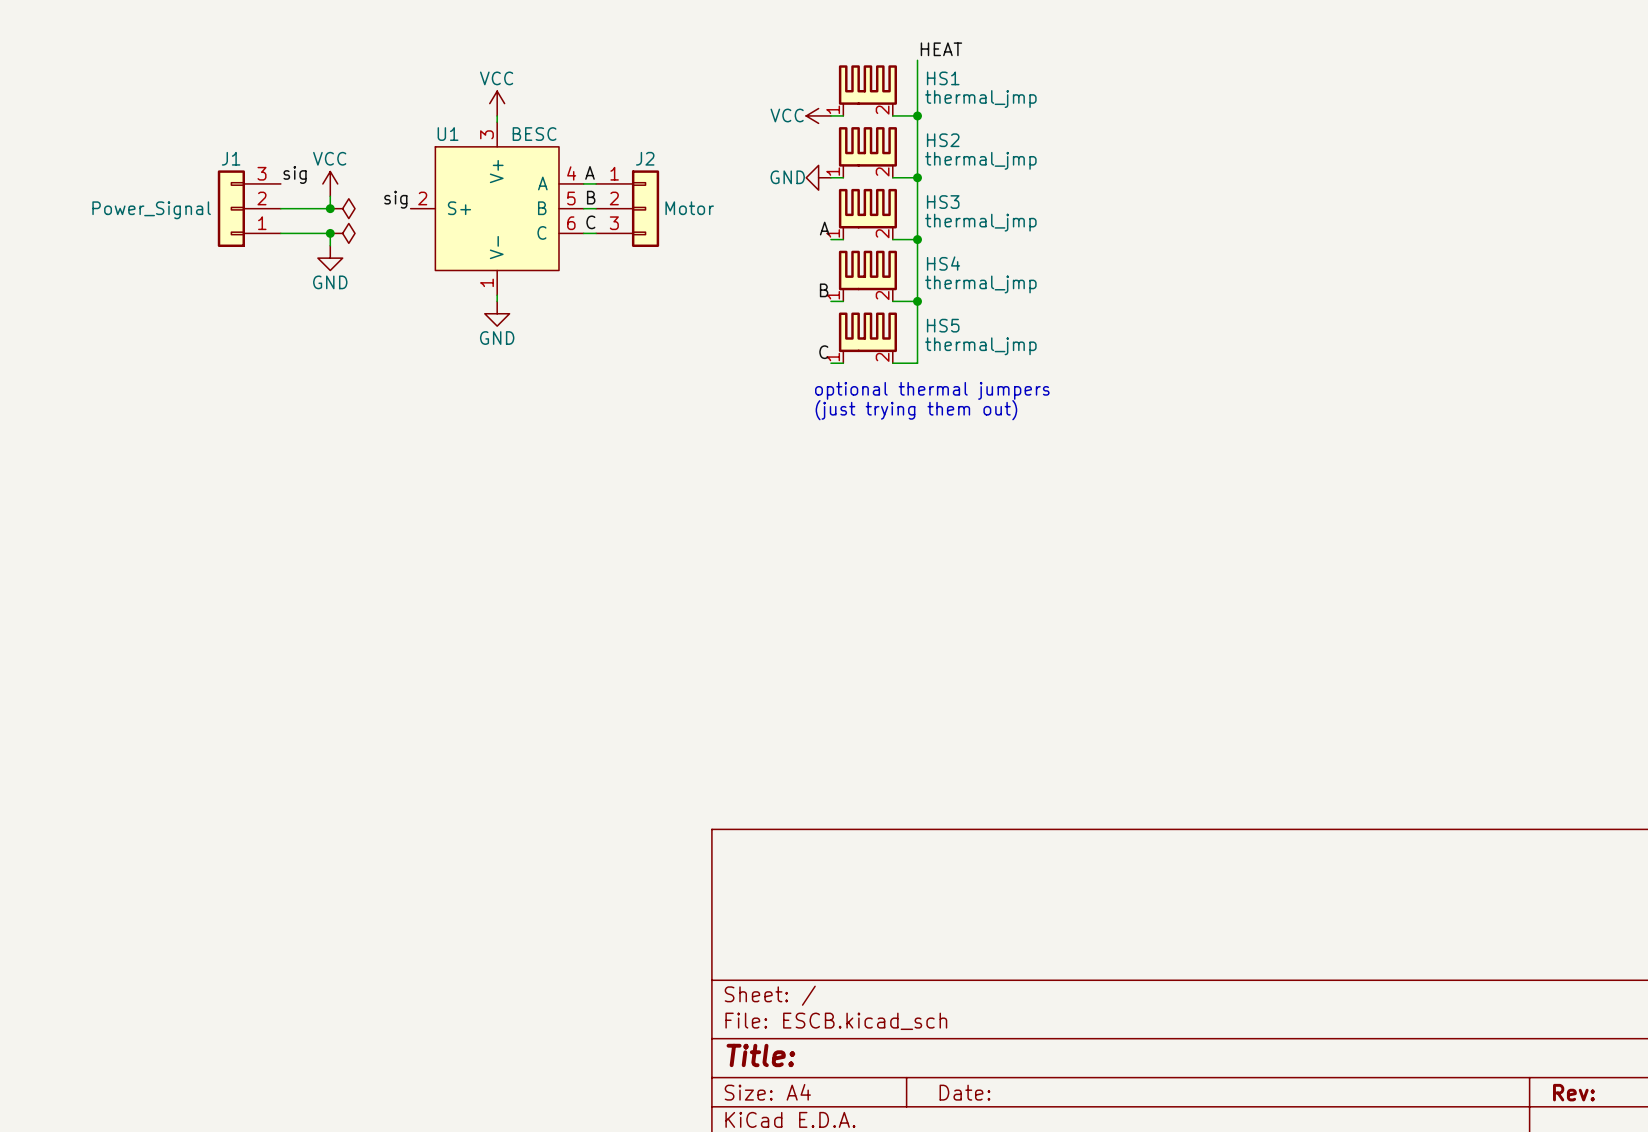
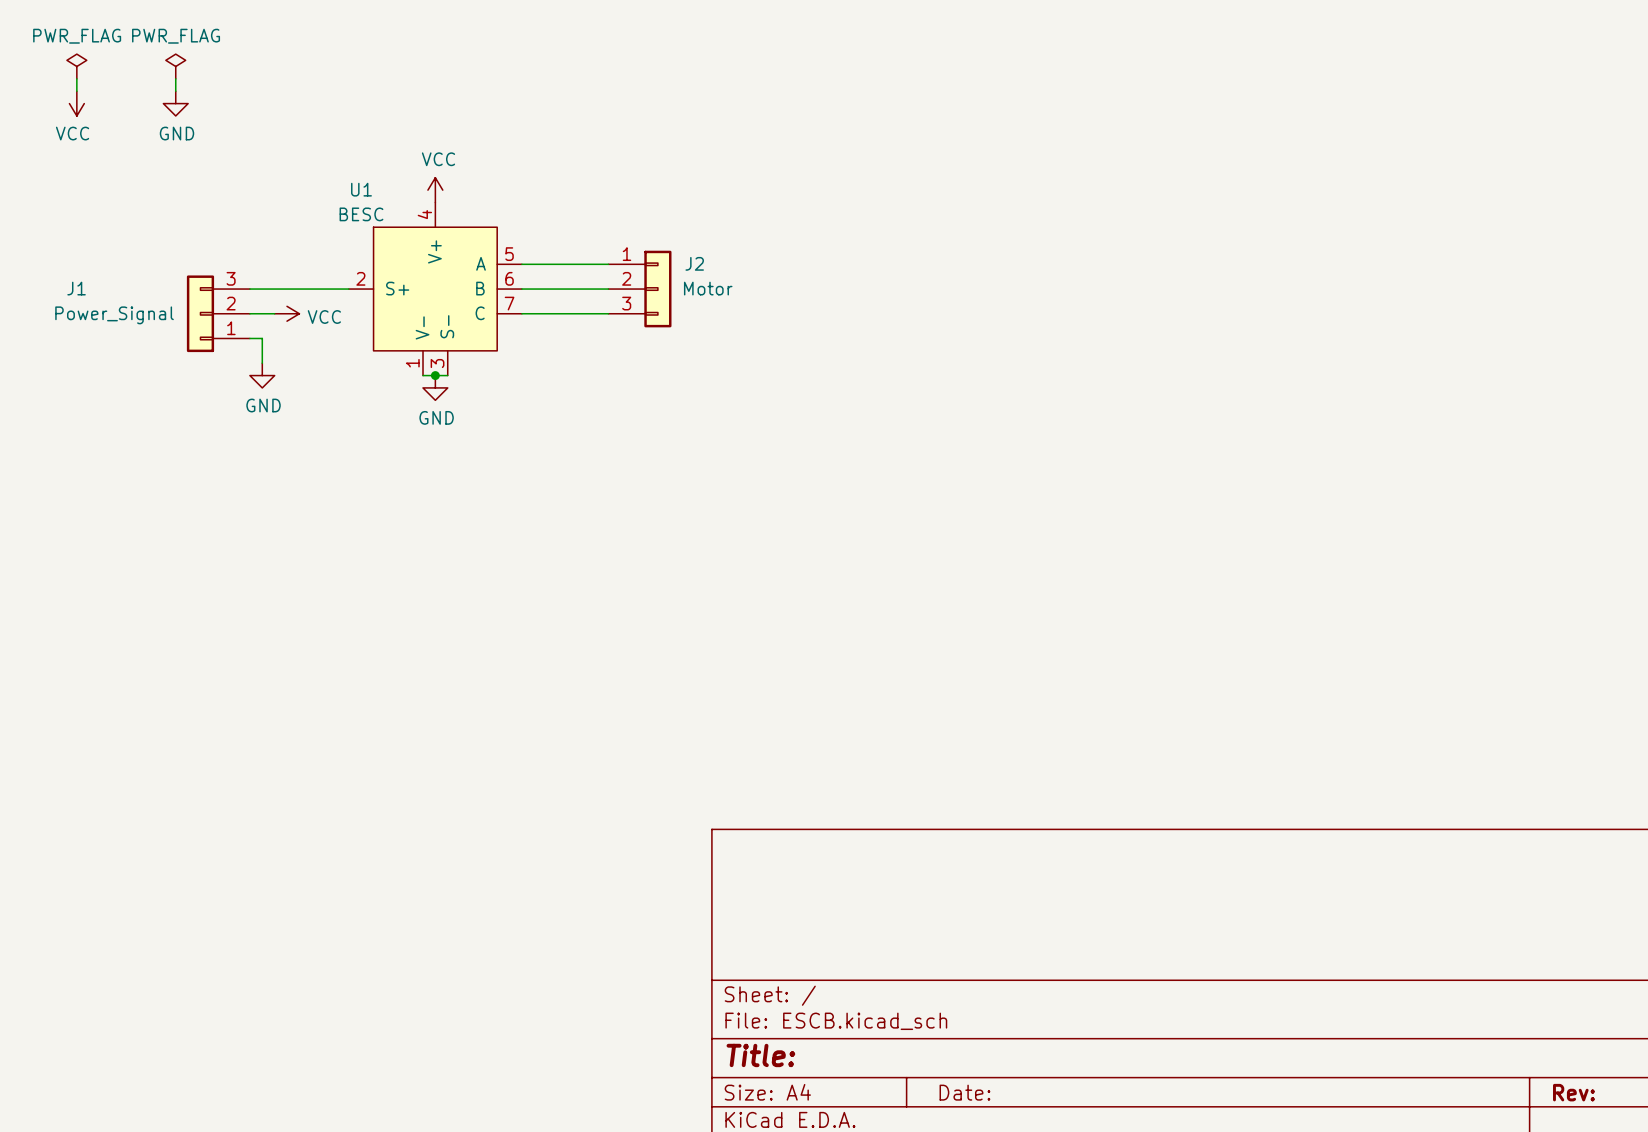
label: HEAT (941, 49) -> none
wire: (917, 60) (917, 363) (892, 363) -> none
power symbol: none -> PWR_FLAG (76, 66)
power symbol: none -> PWR_FLAG (175, 66)
wire: none -> (76, 78) (76, 91)
wire: none -> (175, 78) (175, 91)
HS1: thermal_jmp (867, 90) -> none
power symbol: none -> VCC (76, 103)
power symbol: none -> GND (175, 103)
power symbol: VCC (497, 103) -> none
wire: (497, 115) (497, 122) -> none
power symbol: VCC (818, 115) -> none
wire: (830, 115) (843, 115) -> none
wire: (892, 115) (917, 115) -> none
junction: (917, 115) -> none
U1 symbol: [410, 122, 584, 296] -> [348, 202, 522, 376]
U1 name position: U1 (448, 134) -> U1 (361, 189)
U1 value position: BESC (534, 134) -> BESC (361, 214)
HS2: thermal_jmp (867, 152) -> none
J1 name position: J1 (231, 158) -> J1 (76, 288)
J2 name position: J2 (645, 158) -> J2 (694, 263)
label: A (589, 172) -> none
label: sig (295, 174) -> none
power symbol: GND (818, 177) -> none
wire: (830, 177) (843, 177) -> none
wire: (892, 177) (917, 177) -> none
junction: (917, 177) -> none
power symbol: VCC (330, 183) -> none
wire: (583, 183) (596, 183) -> none
power symbol: none -> VCC (435, 190)
wire: (330, 196) (330, 208) (280, 208) -> none
label: B (591, 197) -> none
label: sig (395, 199) -> none
J1 position: (249, 208) -> (218, 313)
junction: (330, 208) -> none
power symbol: (342, 208) -> none
wire: (583, 208) (596, 208) -> none
J2 position: (627, 208) -> (639, 289)
J2 value position: Motor (689, 208) -> Motor (708, 288)
J1 value position: Power_Signal (151, 210) -> Power_Signal (114, 315)
HS3: thermal_jmp (867, 214) -> none
label: C (590, 222) -> none
label: A (824, 228) -> none
wire: (280, 233) (330, 233) (330, 245) -> none
junction: (330, 233) -> none
power symbol: (342, 233) -> none
wire: (583, 233) (596, 233) -> none
wire: (830, 239) (843, 239) -> none
wire: (892, 239) (917, 239) -> none
junction: (917, 239) -> none
power symbol: GND (330, 258) -> none
wire: none -> (521, 264) (608, 264)
HS4: thermal_jmp (867, 276) -> none
wire: none -> (249, 289) (348, 289)
wire: none -> (521, 289) (608, 289)
label: B (824, 290) -> none
wire: (830, 301) (843, 301) -> none
wire: (892, 301) (917, 301) -> none
junction: (917, 301) -> none
wire: none -> (249, 313) (274, 313)
power symbol: none -> VCC (287, 313)
power symbol: GND (497, 313) -> none
wire: none -> (521, 313) (608, 313)
HS5: thermal_jmp (867, 337) -> none
wire: none -> (249, 338) (262, 338) (262, 363)
label: C (823, 352) -> none
wire: (830, 363) (843, 363) -> none
power symbol: none -> GND (262, 375)
wire: none -> (423, 375) (447, 375)
junction: none -> (435, 375)
power symbol: none -> GND (435, 387)
text: optional thermal jumpers (932, 390) -> none
text: (just trying them out) (916, 410) -> none

